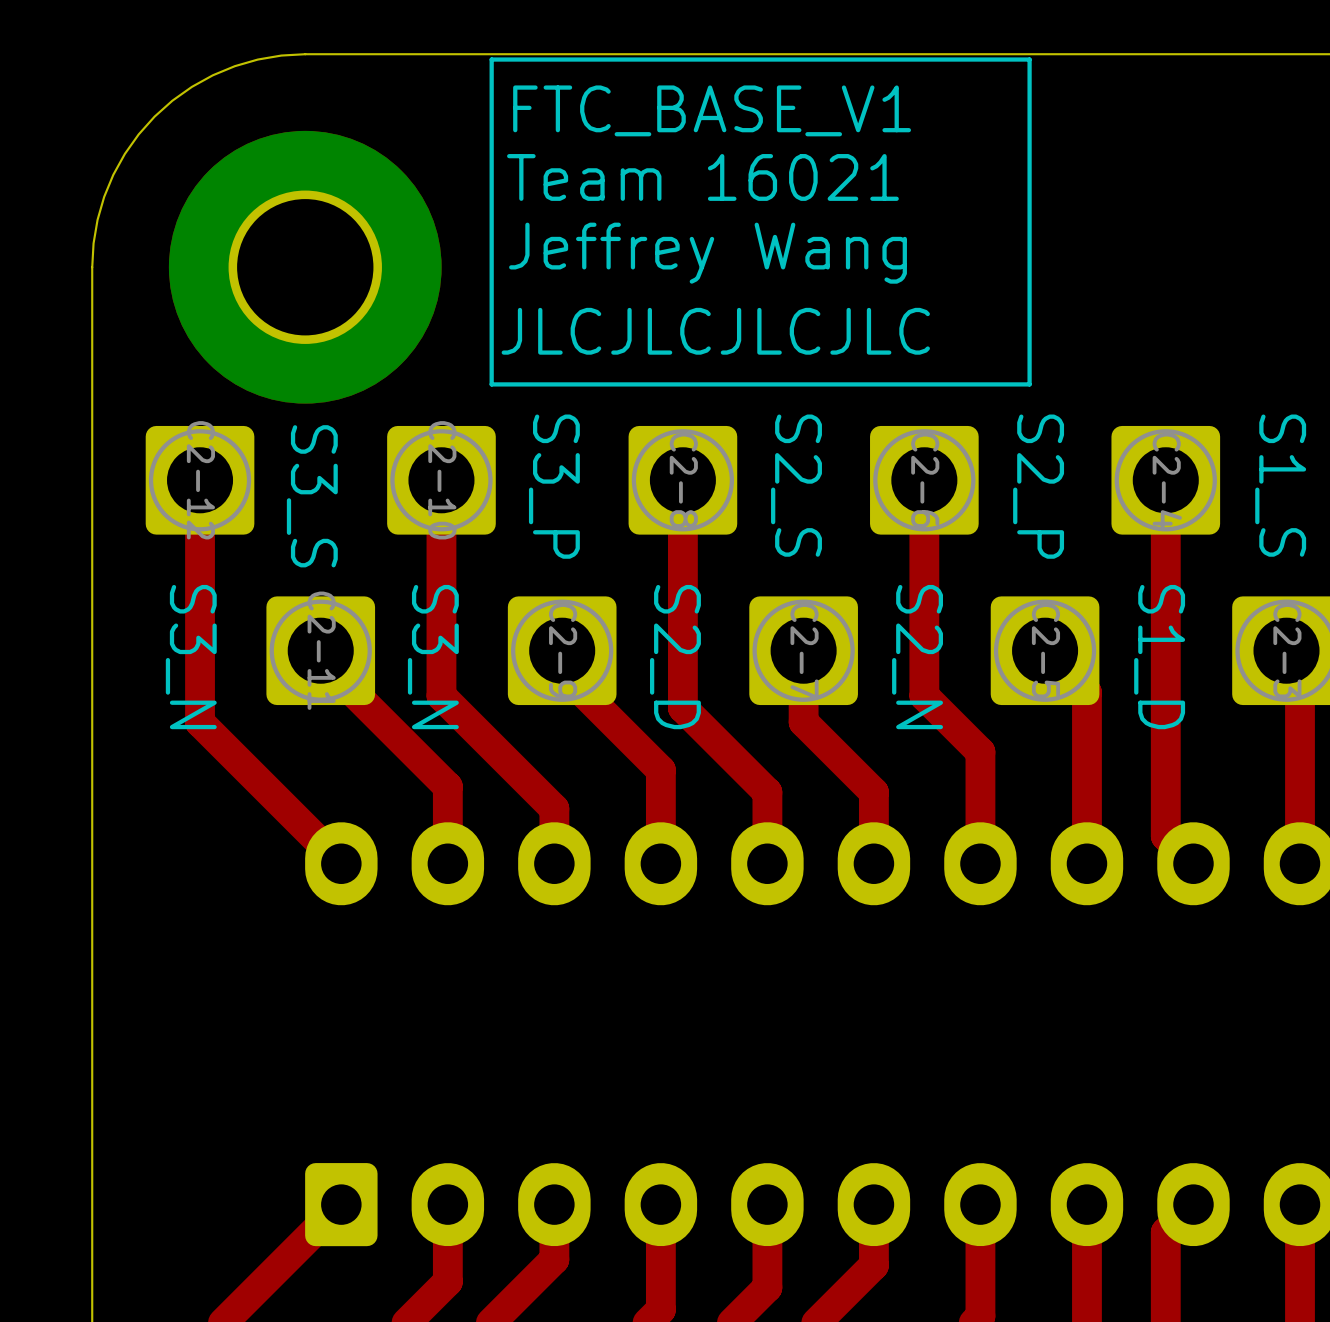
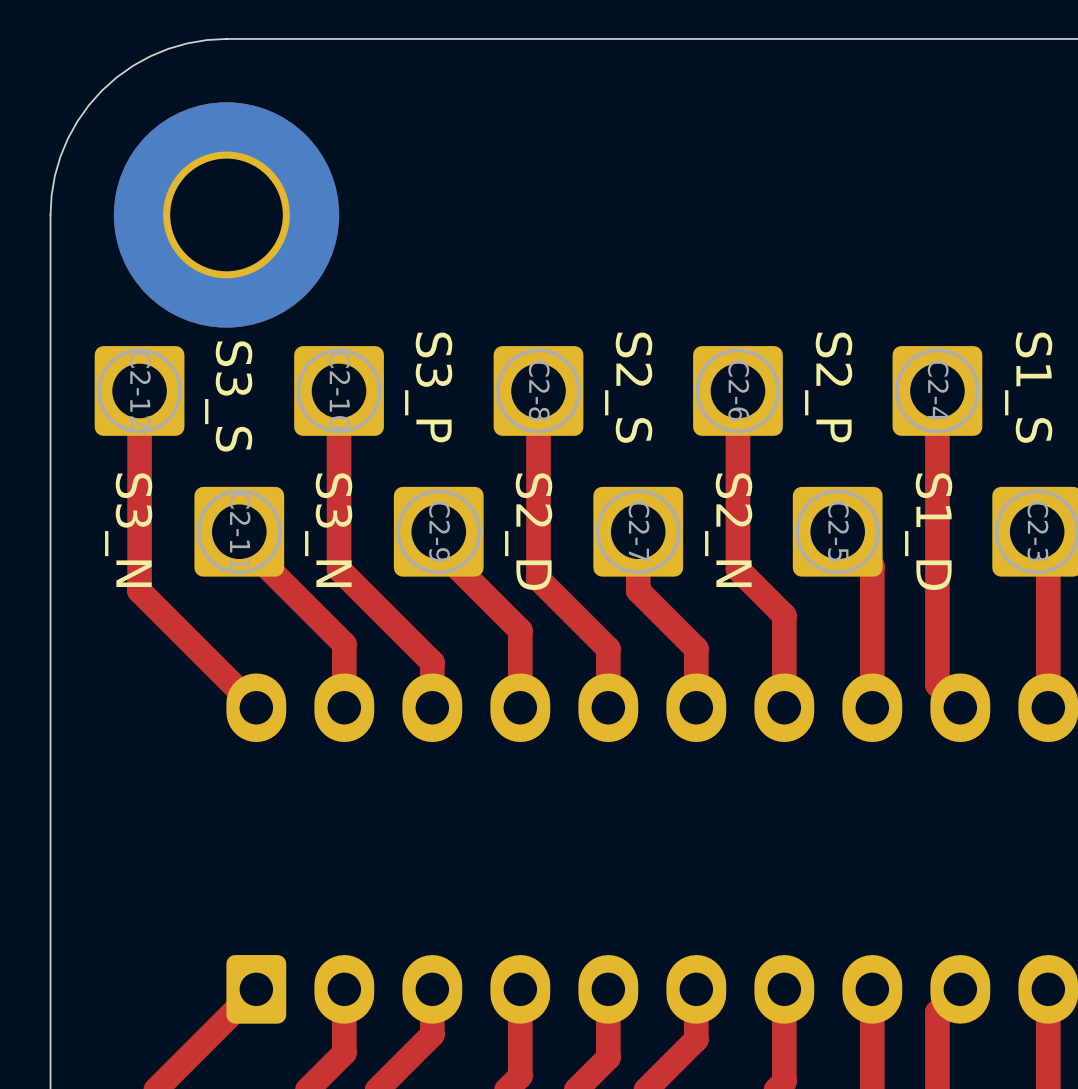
line: (1029, 59) (491, 59) (491, 384) (1029, 384) (1029, 59) -> none
text: FTC_BASE_V1 (712, 110) -> none
text: Team 16021 (702, 177) -> none
text: Jeffrey Wang (708, 253) -> none
text: JLCJLCJLCJLC (715, 331) -> none

